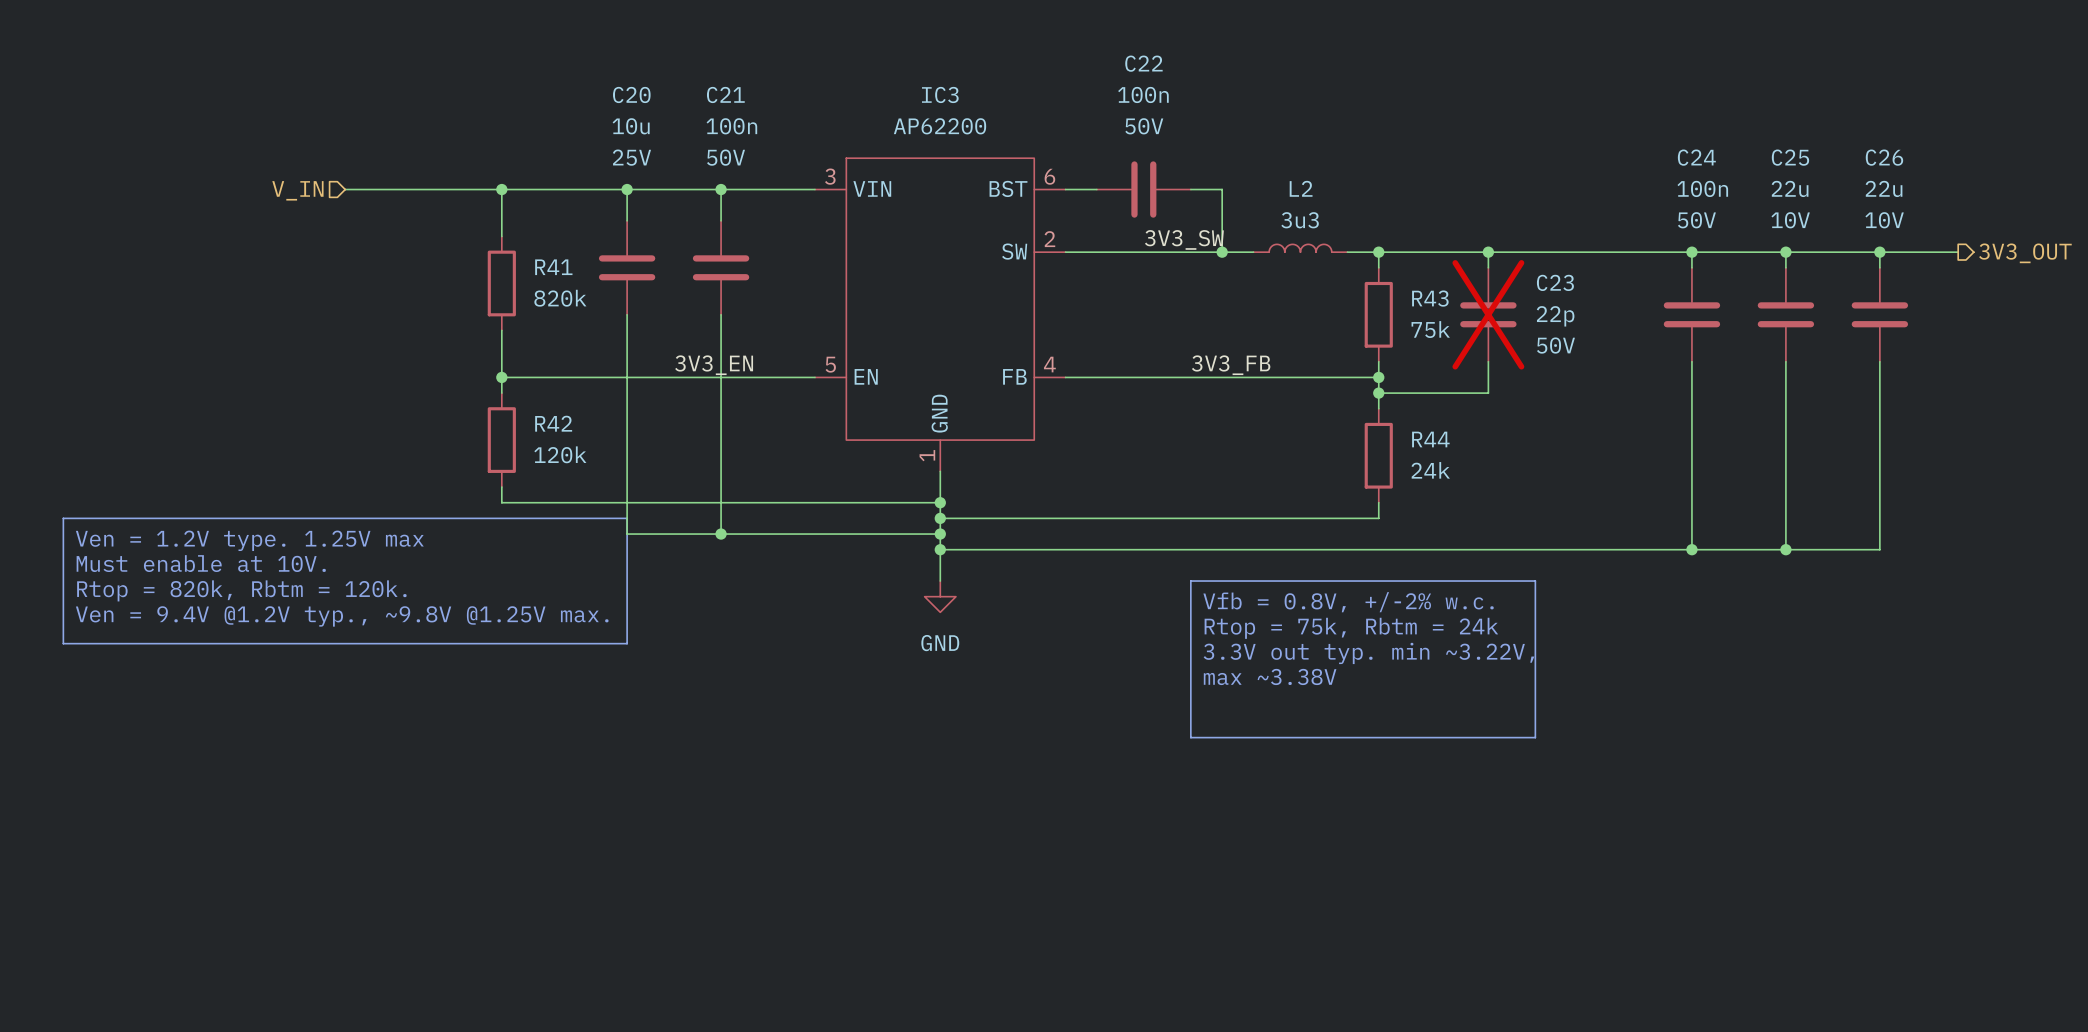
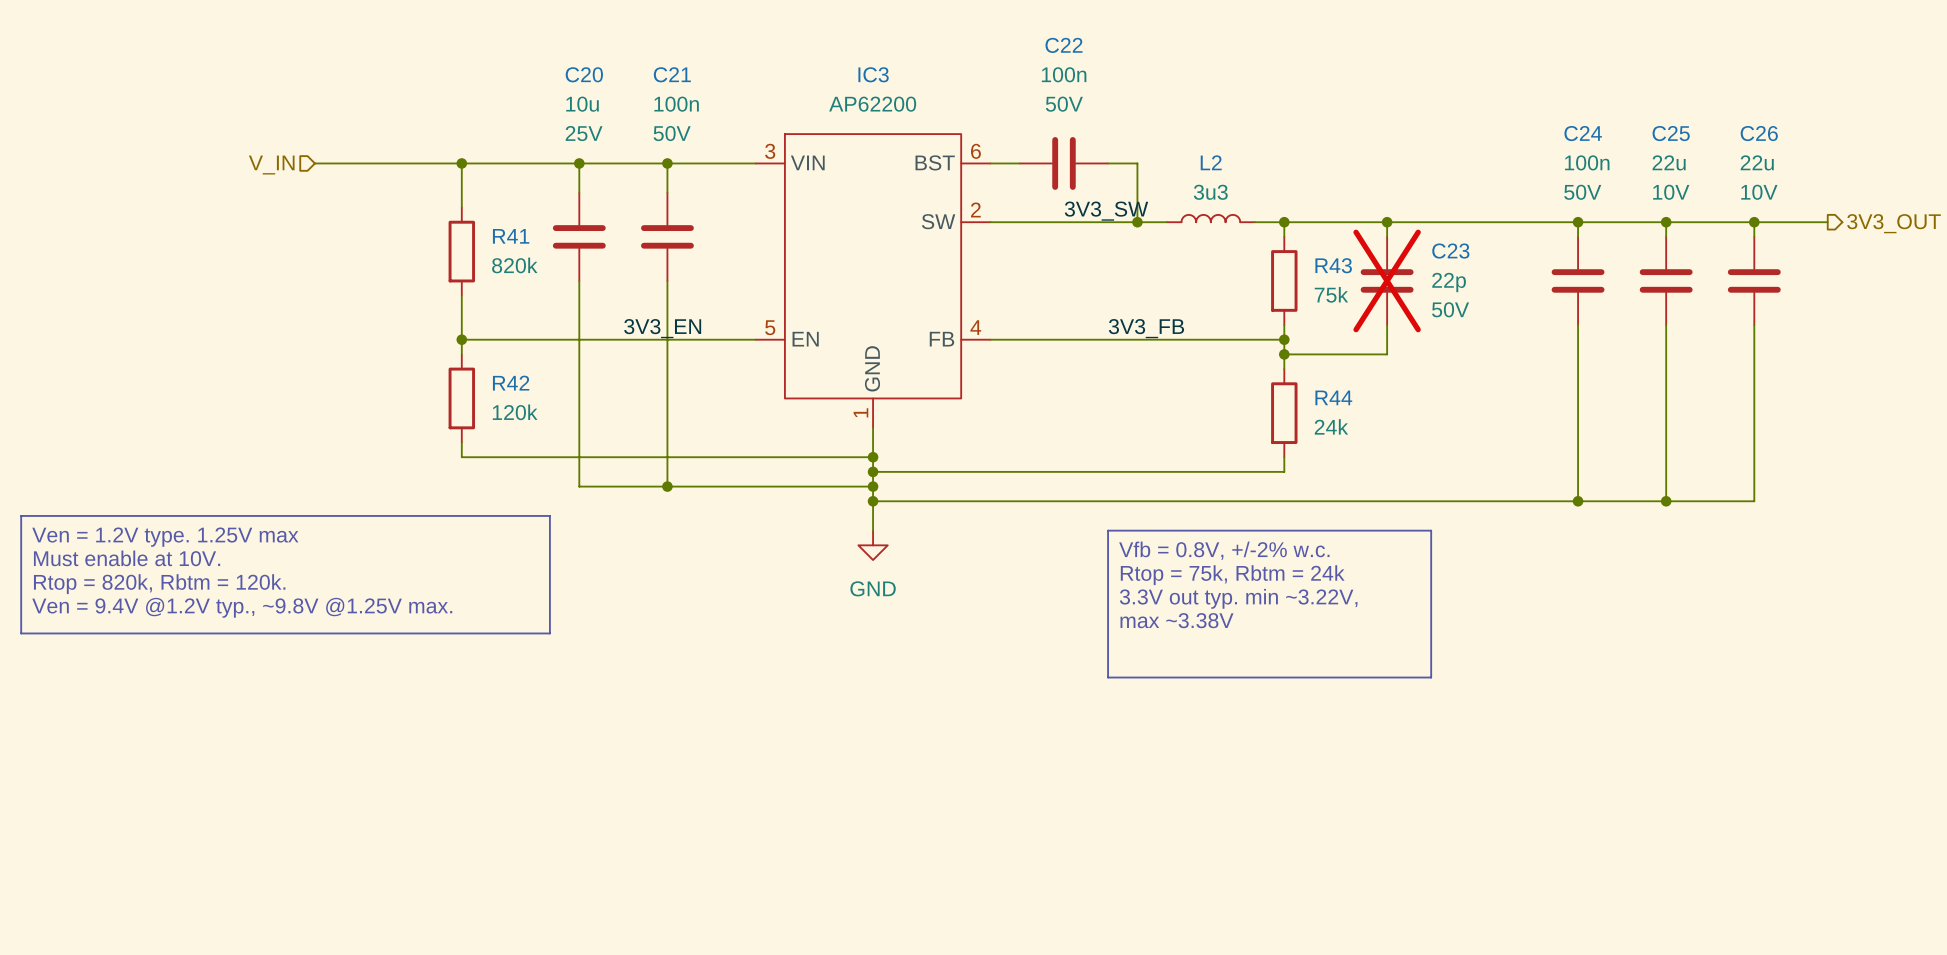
line: (63, 518) (627, 518) (627, 643) (63, 643) (63, 518) -> (21, 515) (549, 515) (549, 633) (21, 633) (21, 515)
text position: Ven = 1.2V type. 1.25V max (249, 540) -> Ven = 1.2V type. 1.25V max (165, 537)
text position: Must enable at 10V. (201, 563) -> Must enable at 10V. (127, 558)
text position: Rtop = 820k, Rbtm = 120k. (241, 590) -> Rtop = 820k, Rbtm = 120k. (159, 584)
text position: Ven = 9.4V @1.2V typ., ~9.8V @1.25V max. (342, 616) -> Ven = 9.4V @1.2V typ., ~9.8V @1.25V max. (242, 607)

